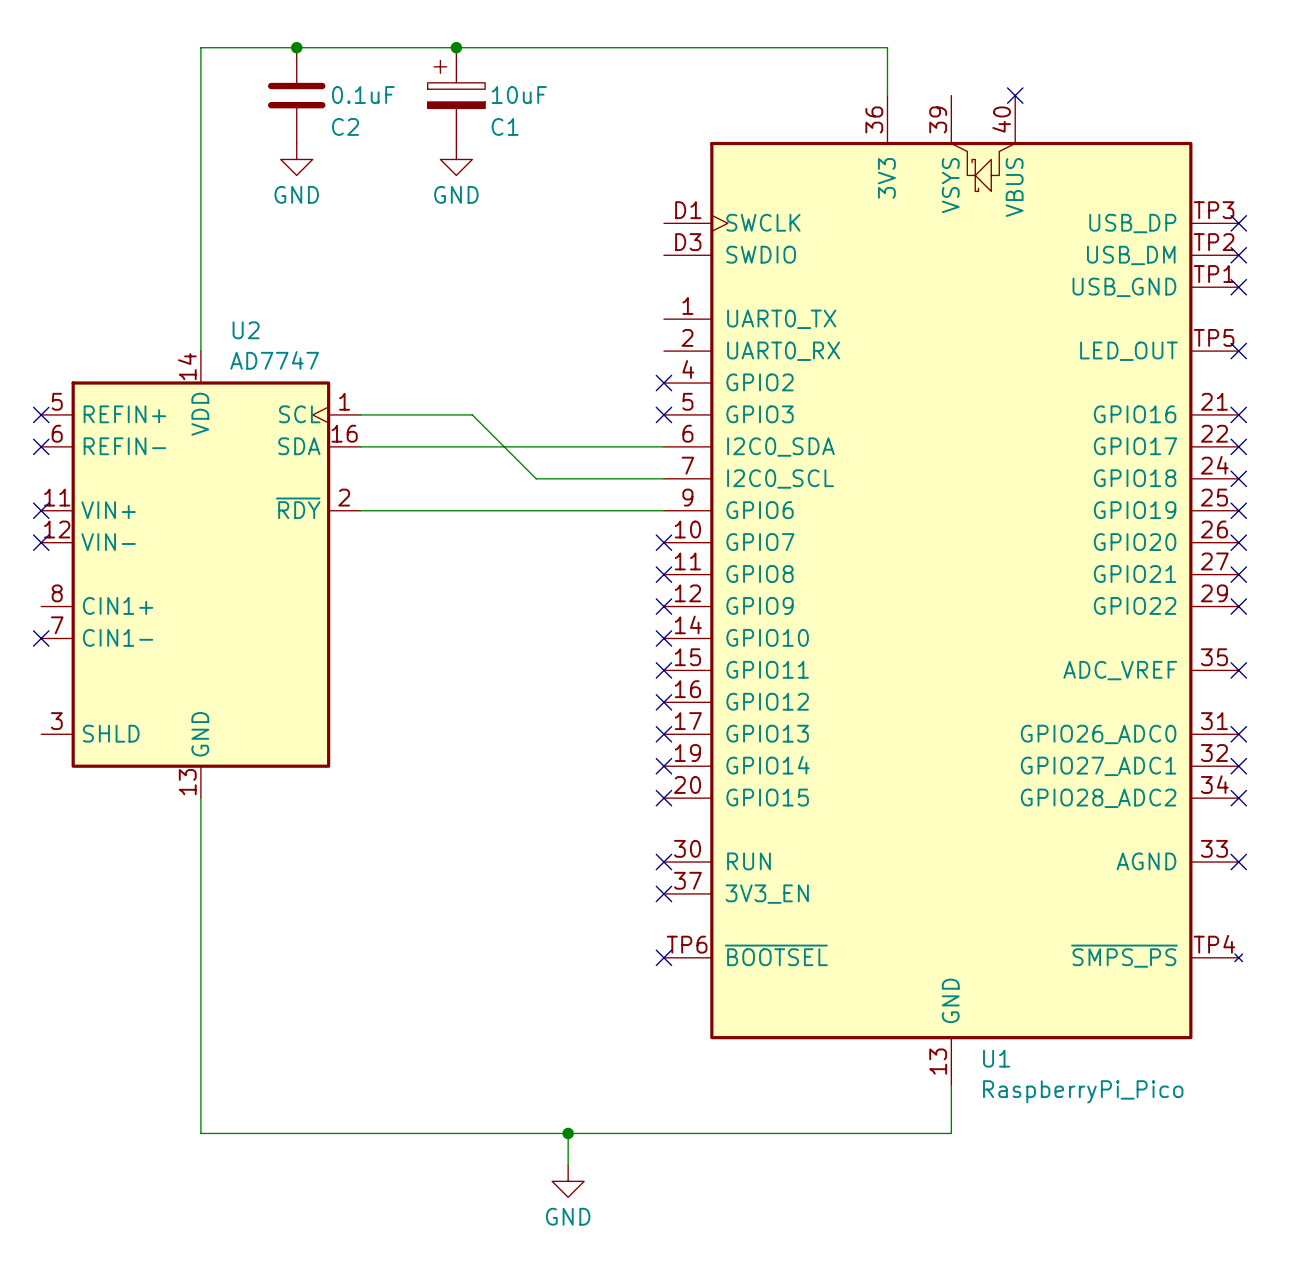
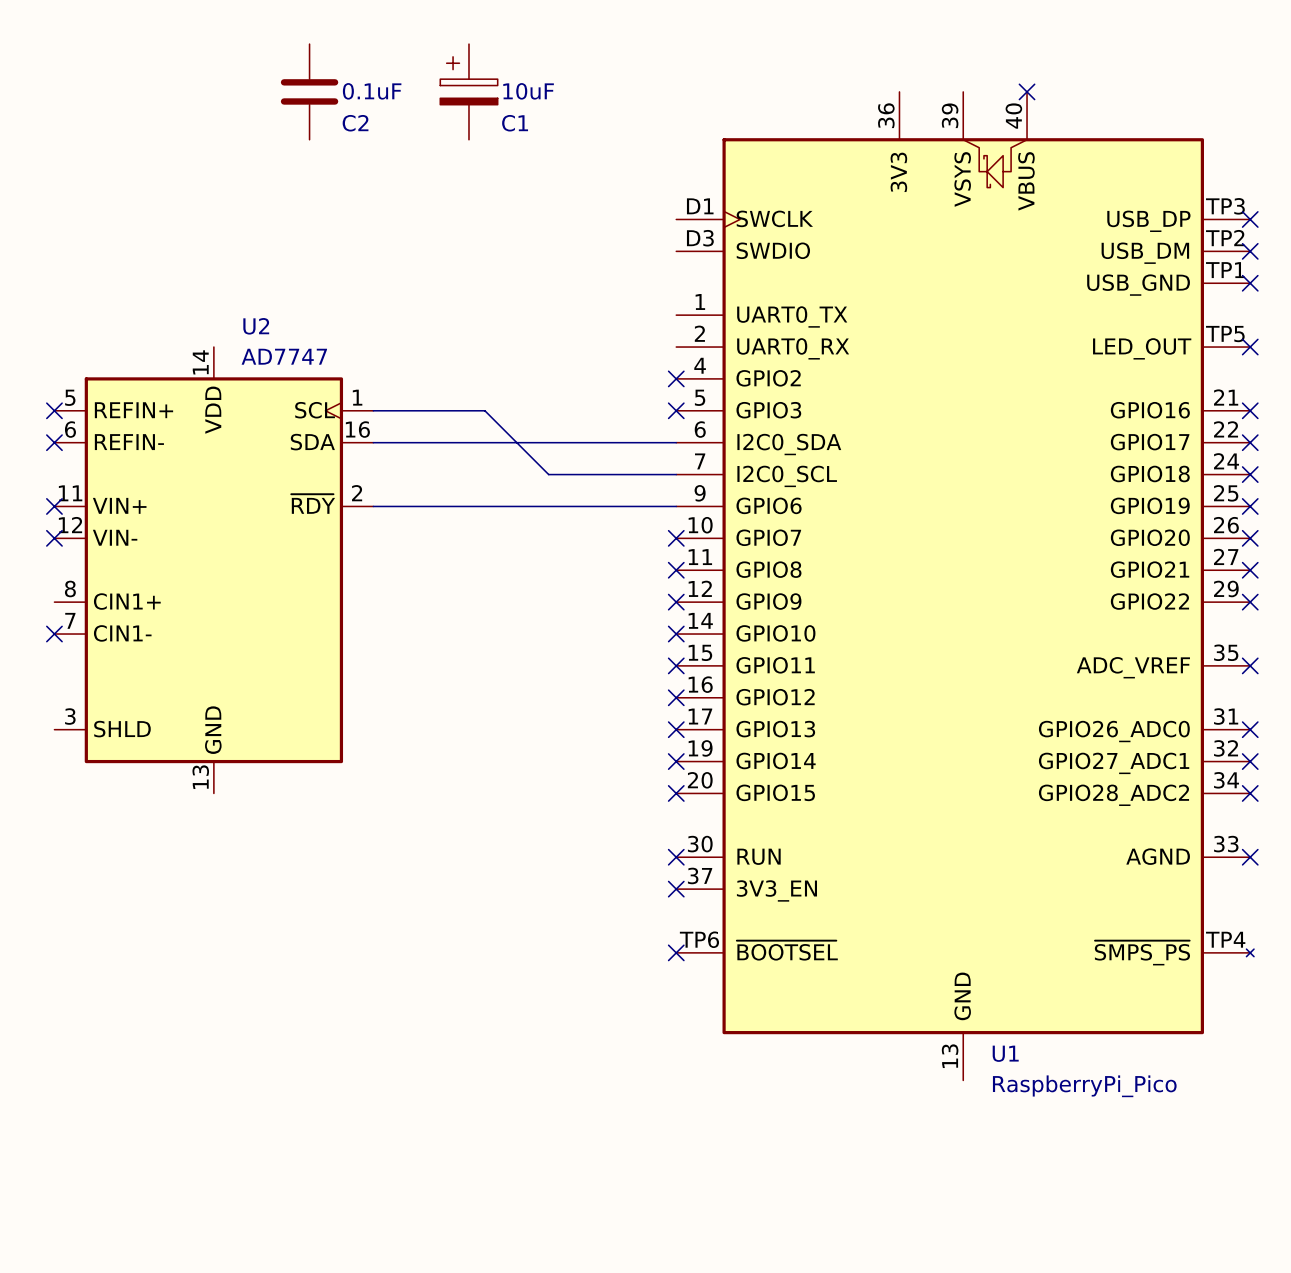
junction: (296, 47) -> none
junction: (456, 47) -> none
wire: (887, 95) (887, 47) (200, 47) (200, 351) -> none
power symbol: GND (296, 159) -> none
power symbol: GND (456, 159) -> none
wire: (200, 798) (200, 1133) (951, 1133) (951, 1085) -> none
wire: (568, 1133) (568, 1165) -> none
junction: (568, 1133) -> none
power symbol: GND (568, 1181) -> none

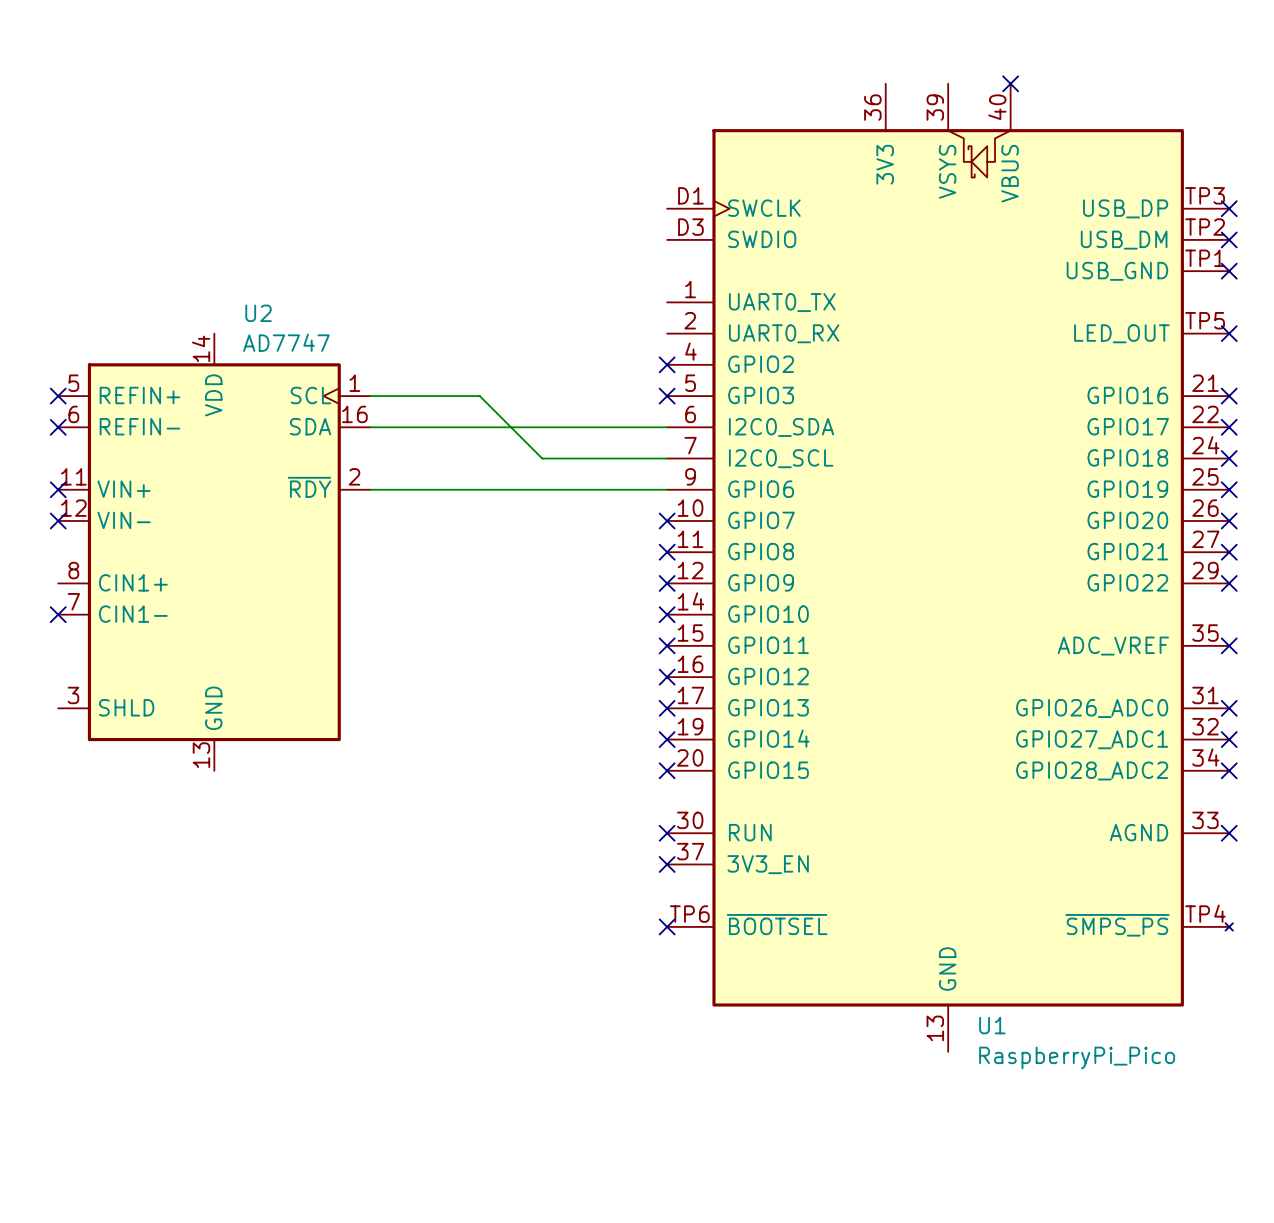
C2: 0.1uF (309, 91) -> none
C1: 10uF (468, 91) -> none

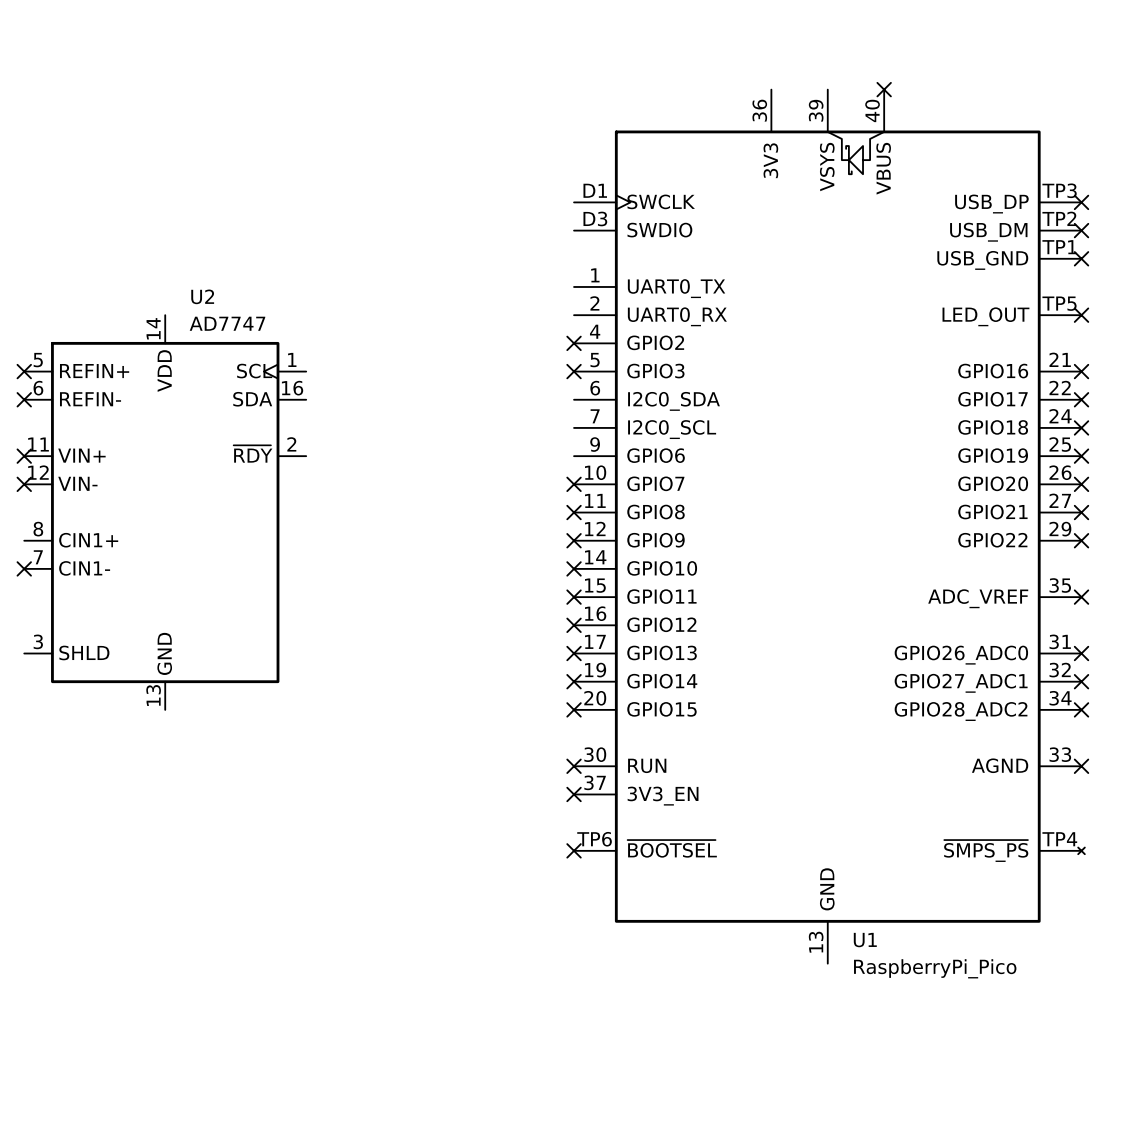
wire: (370, 396) (479, 396) (542, 458) (667, 458) -> none
wire: (370, 427) (667, 427) -> none
wire: (370, 489) (667, 489) -> none

